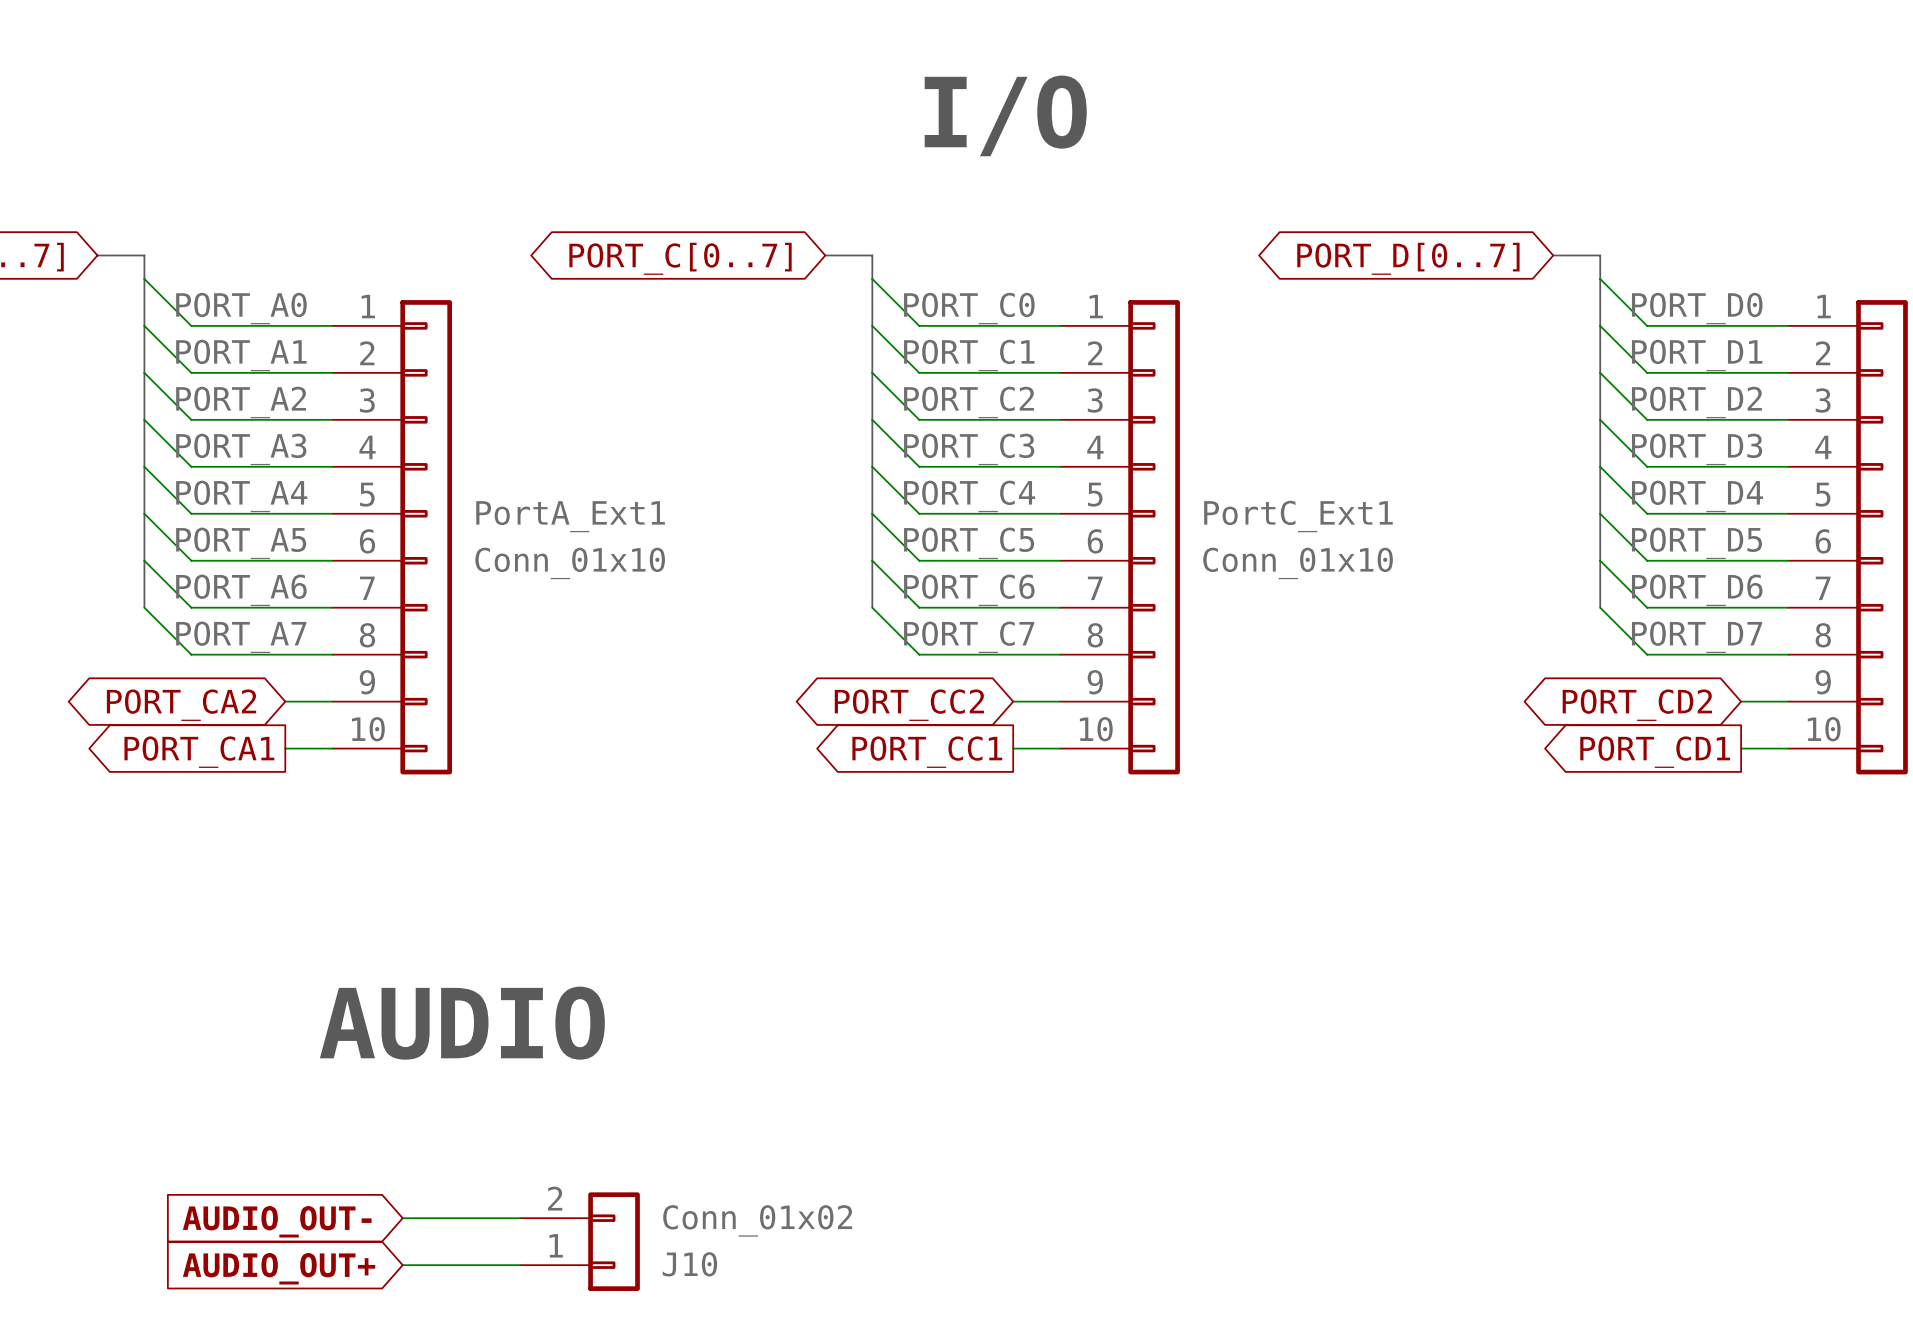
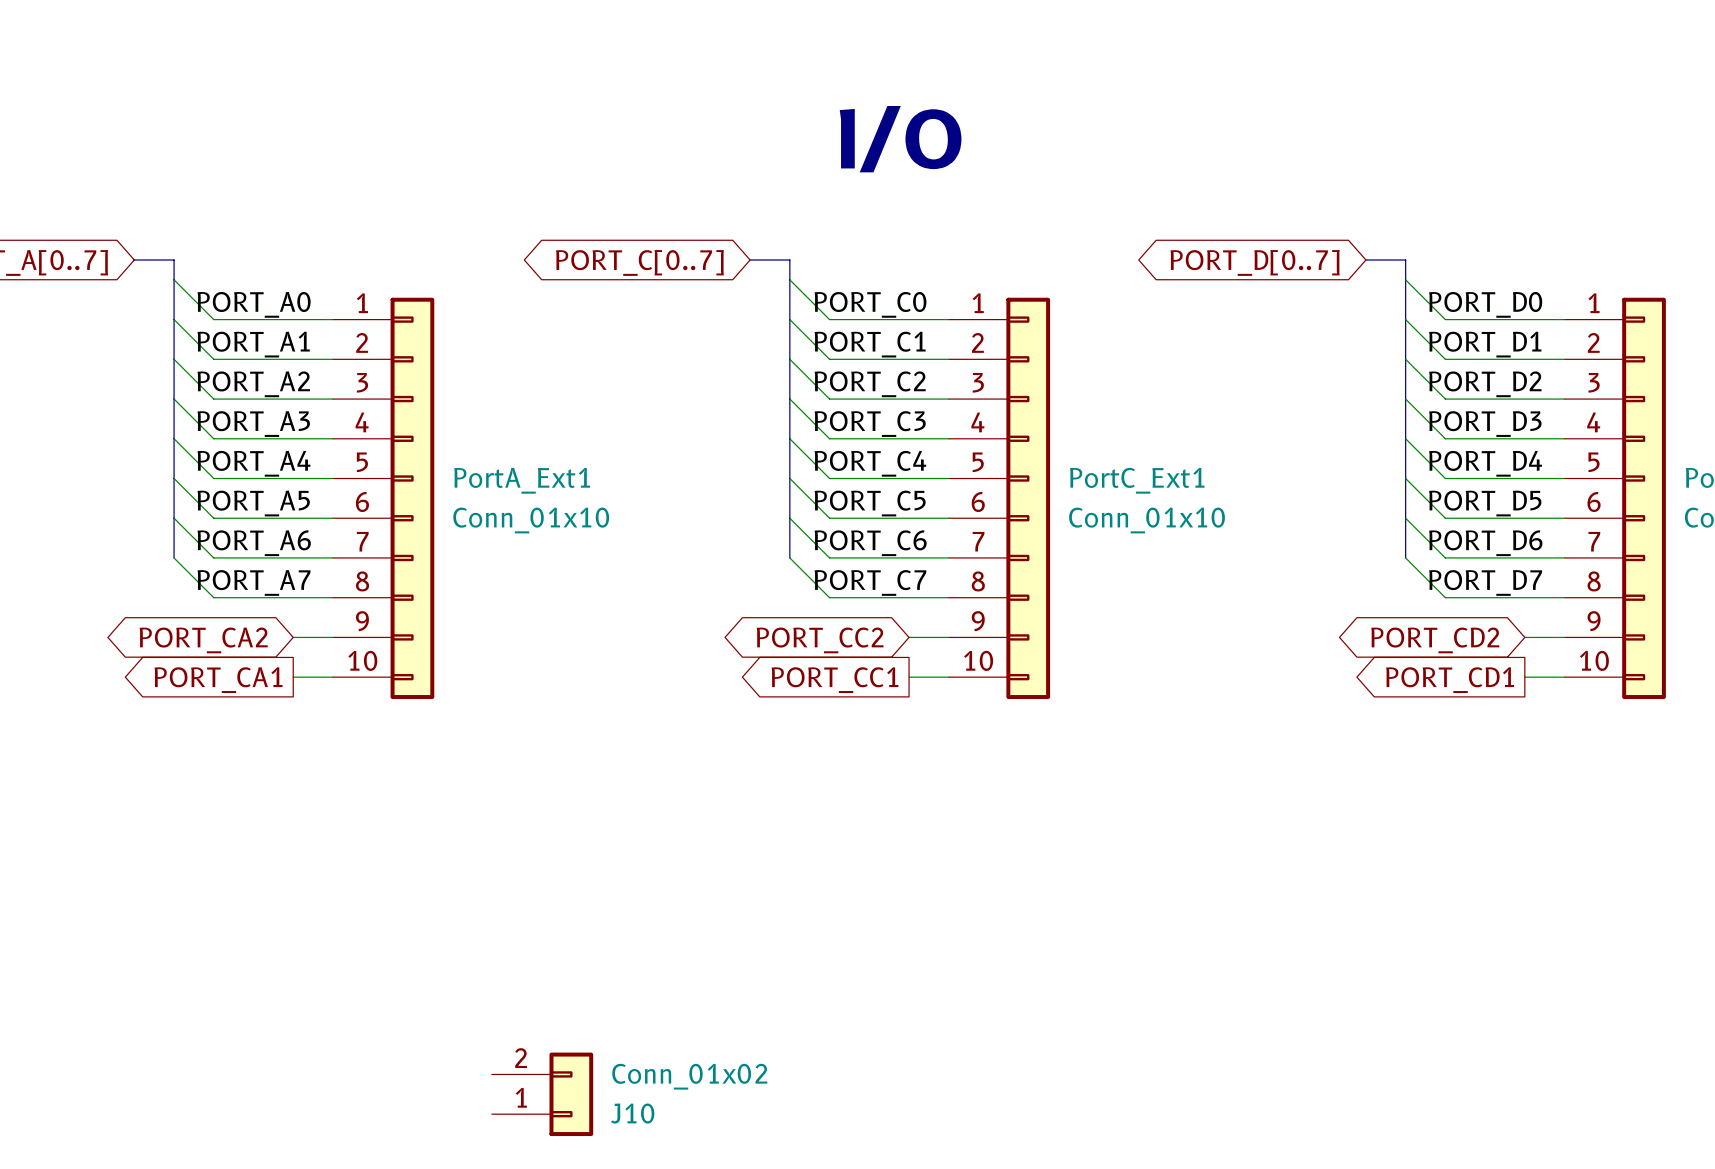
text: AUDIO (462, 1023) -> none
wire: (402, 1218) (520, 1218) -> none
global label: AUDIO_OUT- (277, 1221) -> none
wire: (402, 1265) (520, 1265) -> none
global label: AUDIO_OUT+ (279, 1268) -> none

